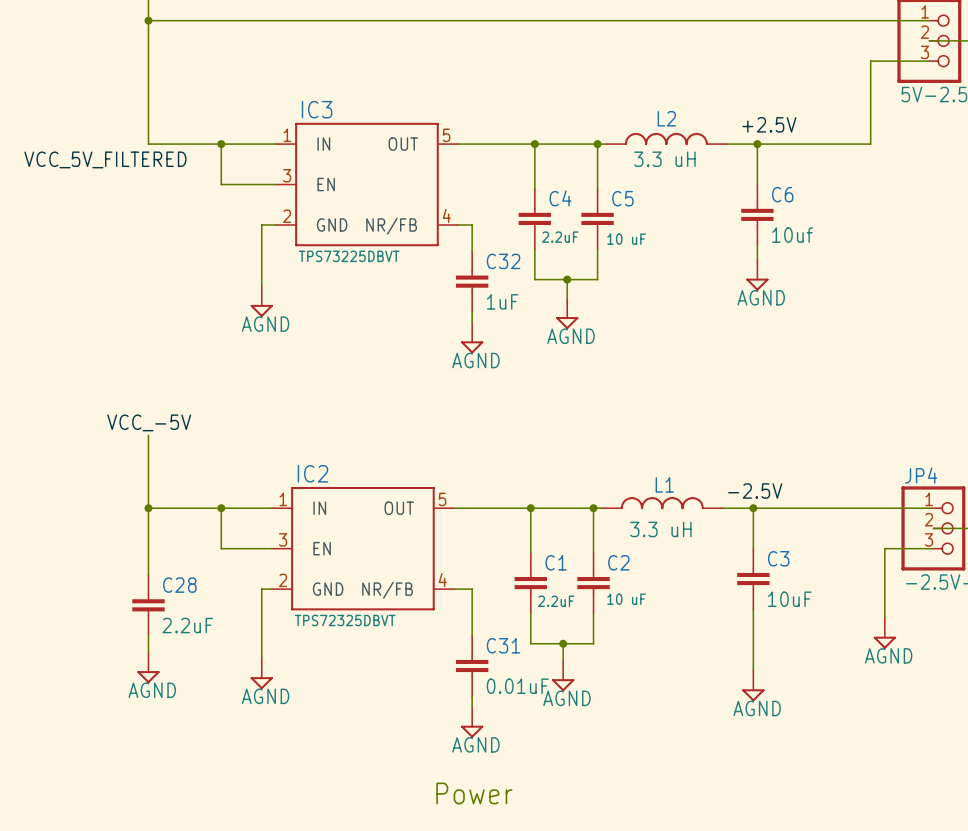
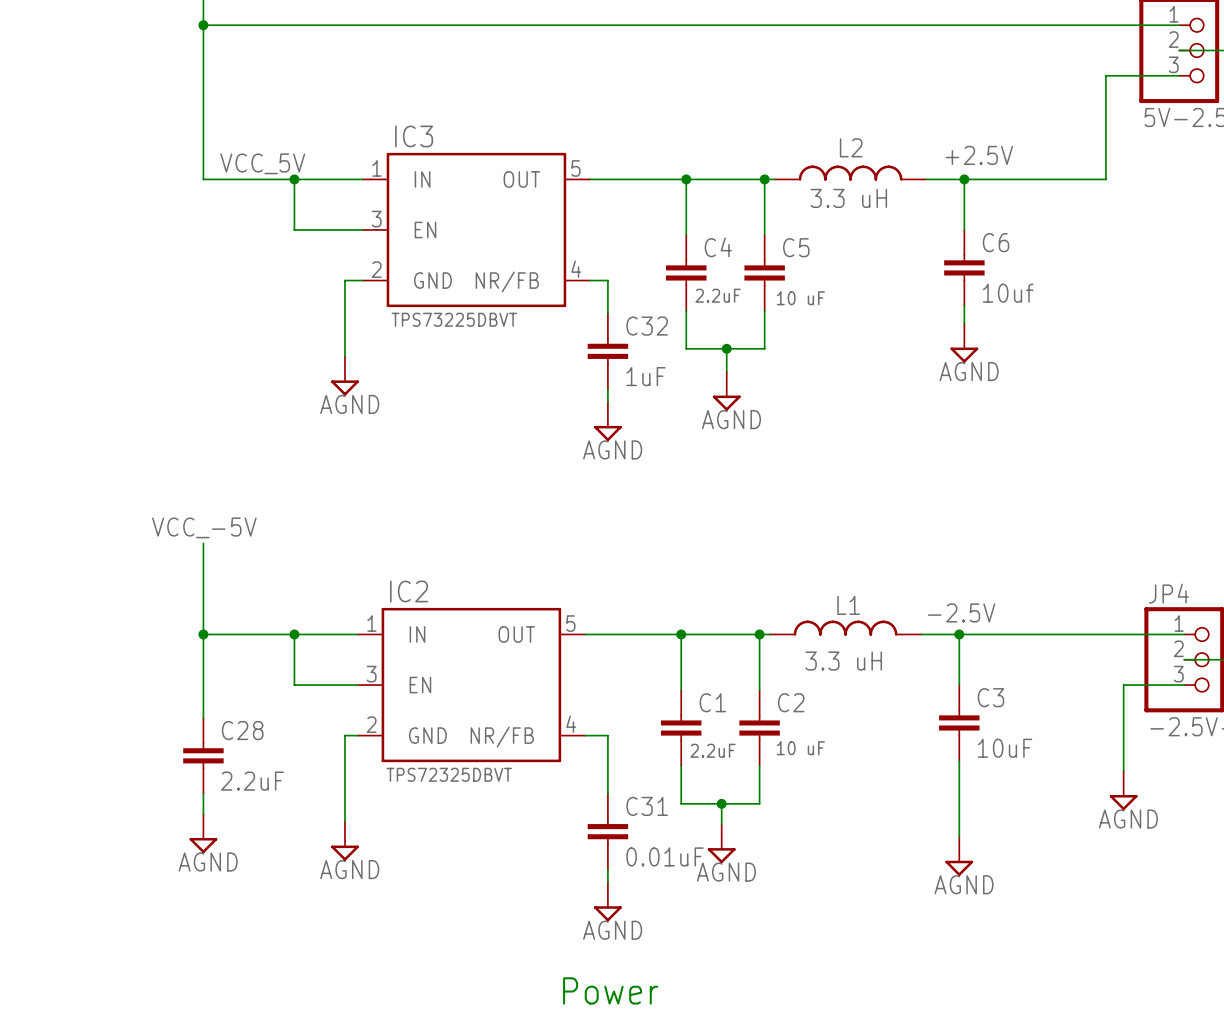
label: none -> VCC_5V (262, 163)
label: VCC_5V_FILTERED (105, 159) -> none

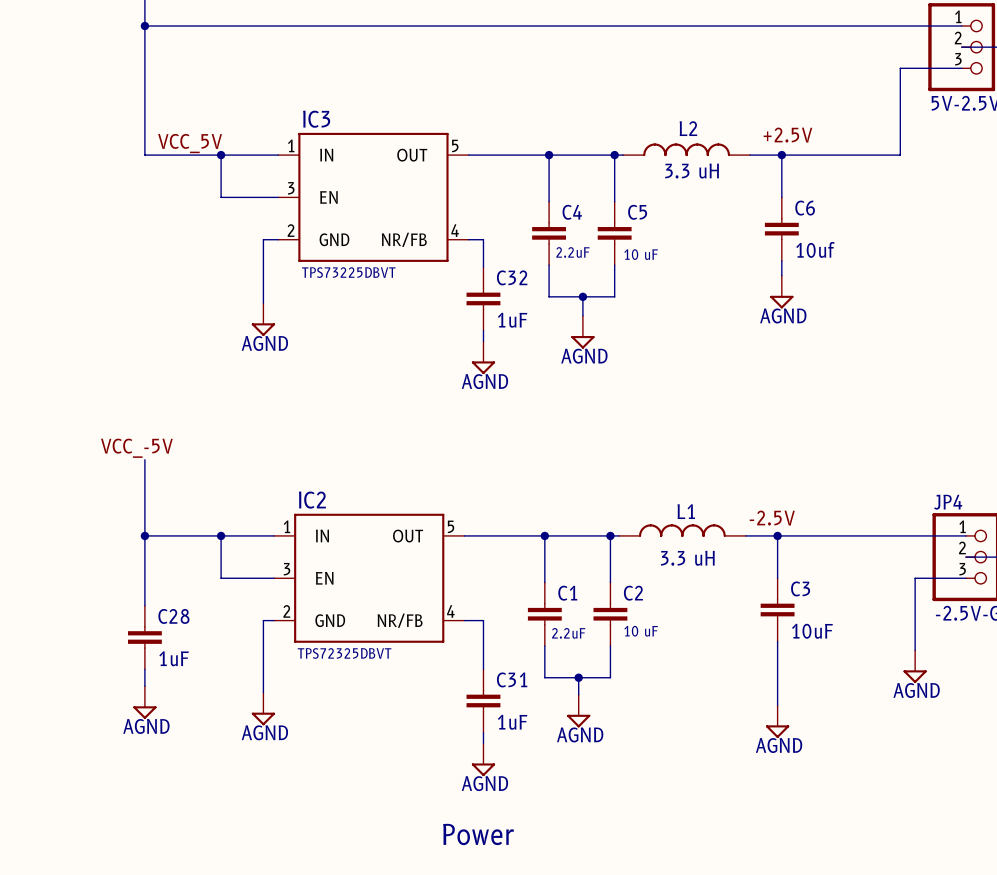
C28 value: 2.2uF (252, 781) -> 1uF (174, 658)
C31 value: 0.01uF (664, 856) -> 1uF (512, 722)

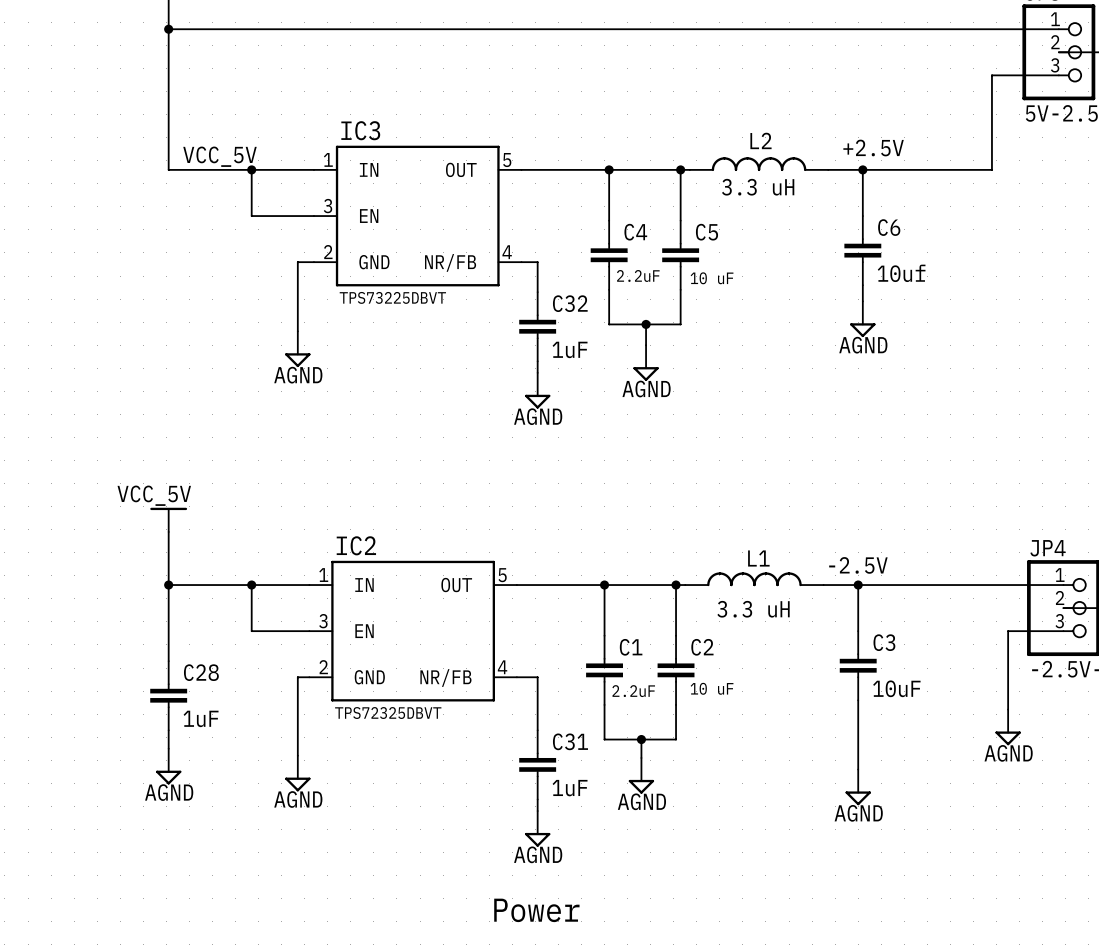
label: VCC_-5V (136, 448) -> none
power symbol: none -> VCC_5V (168, 519)

